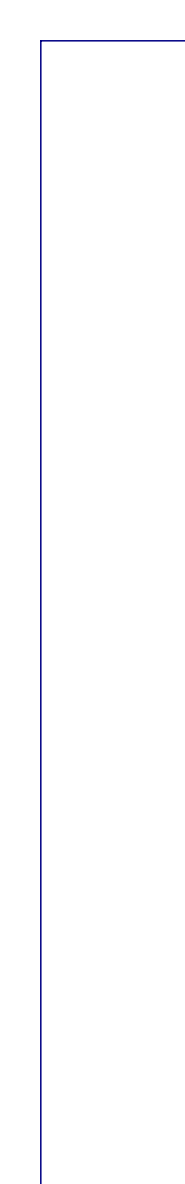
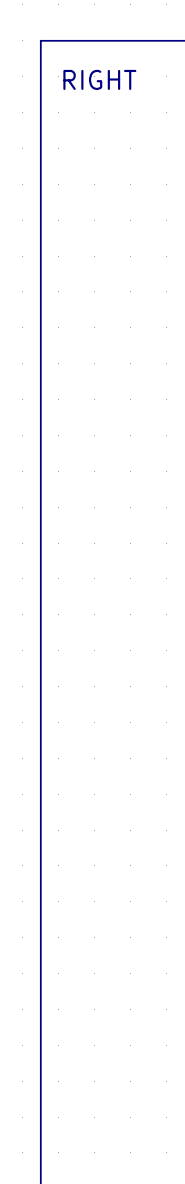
text: none -> RIGHT (99, 79)

